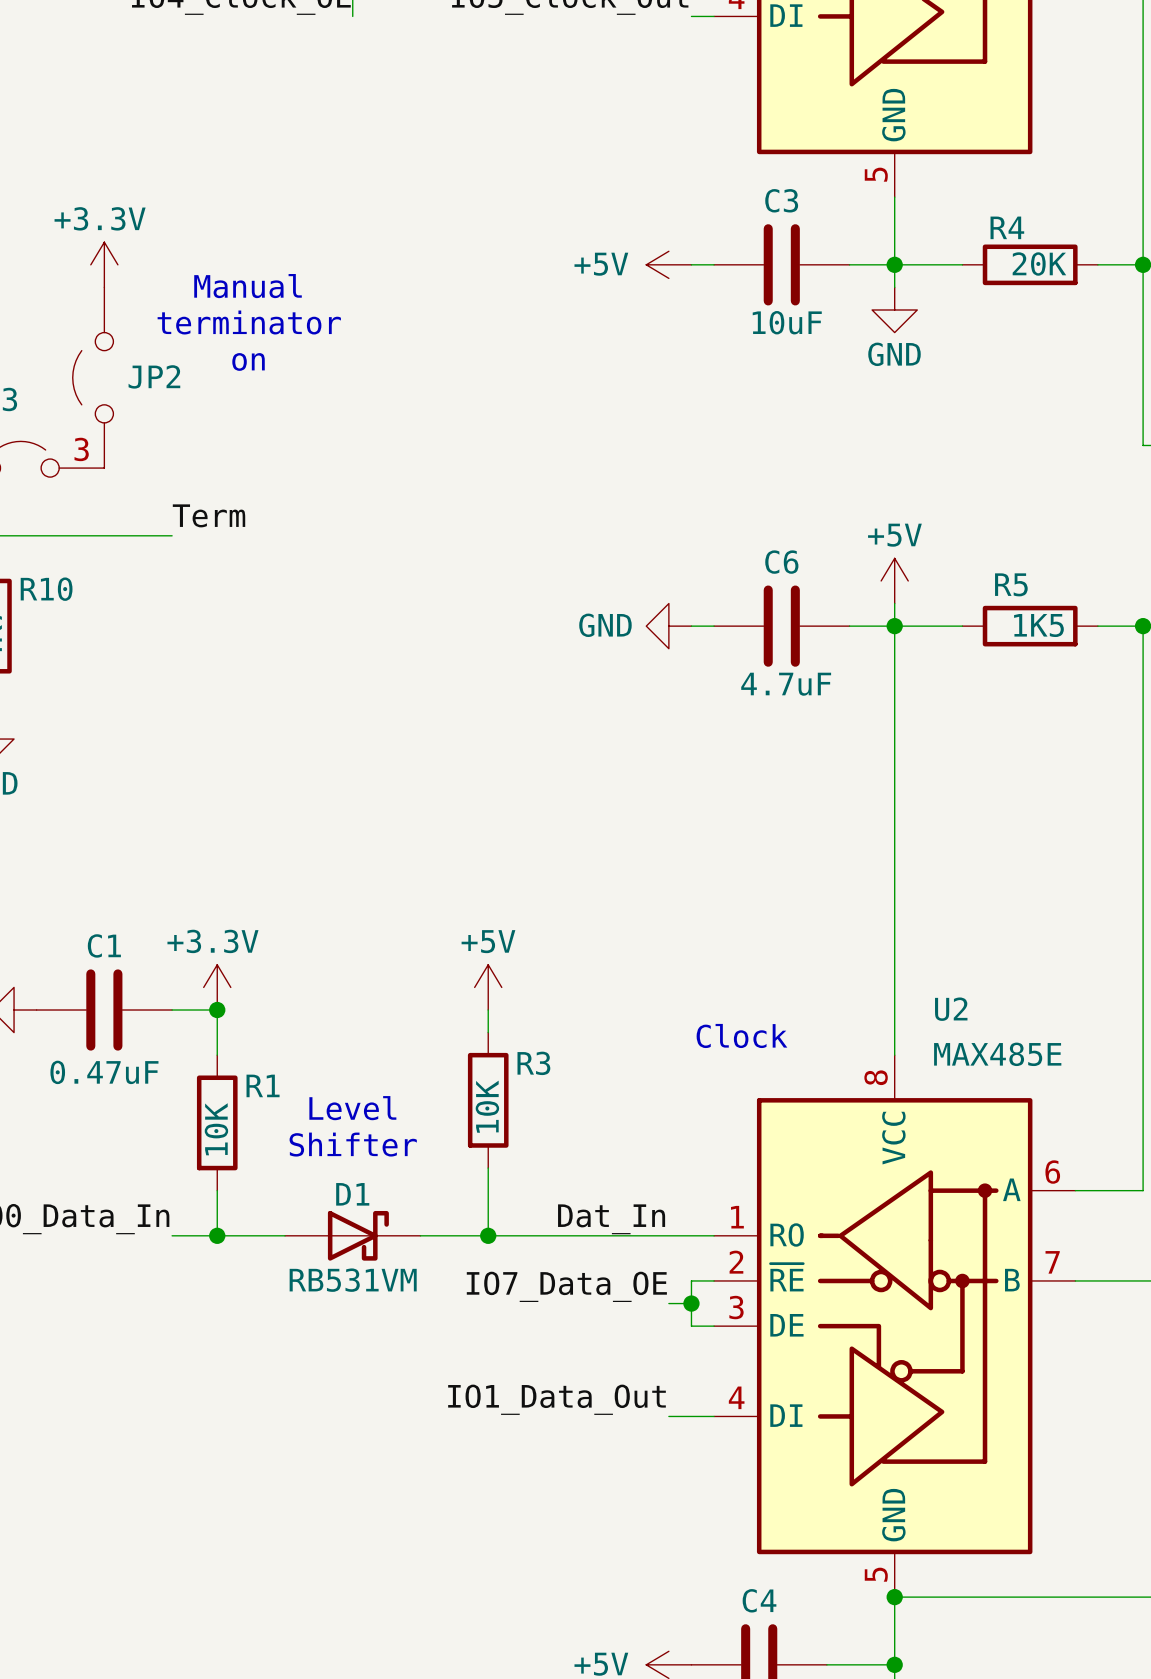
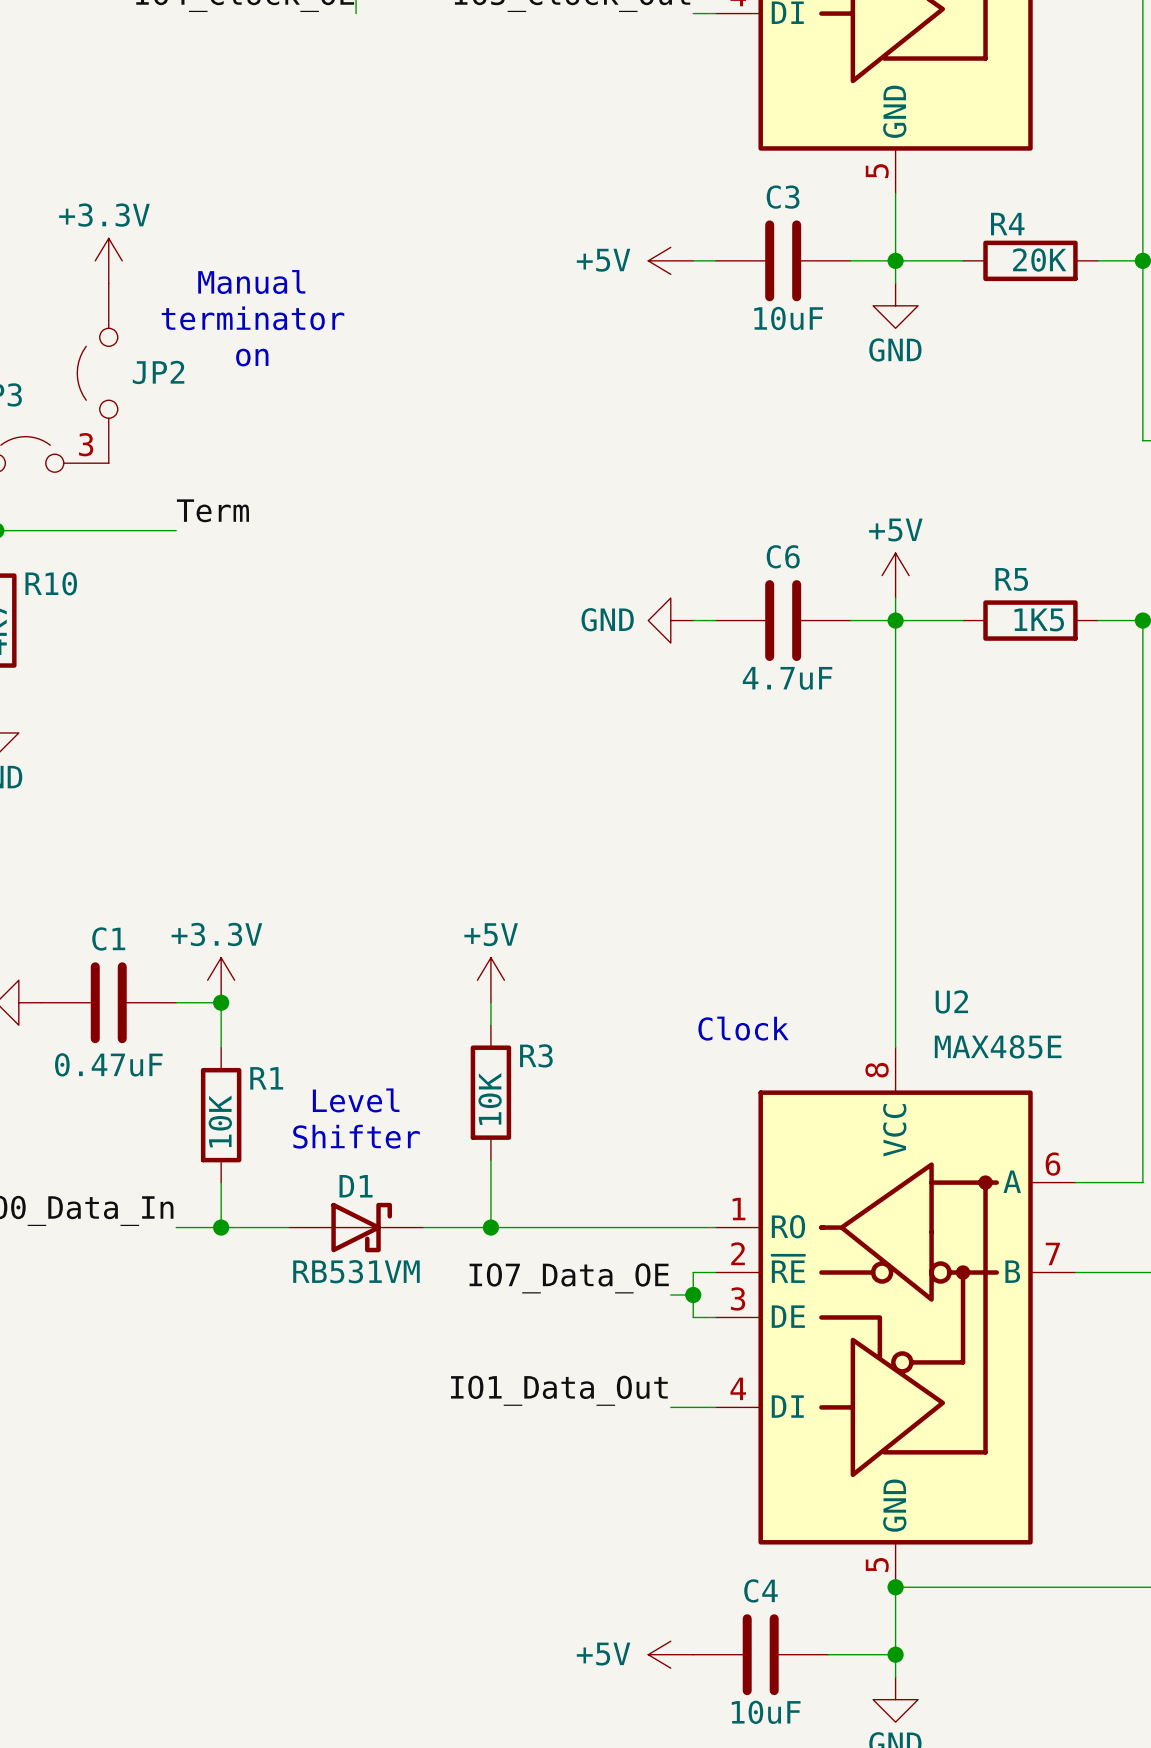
label: Dat_In (611, 1219) -> none

